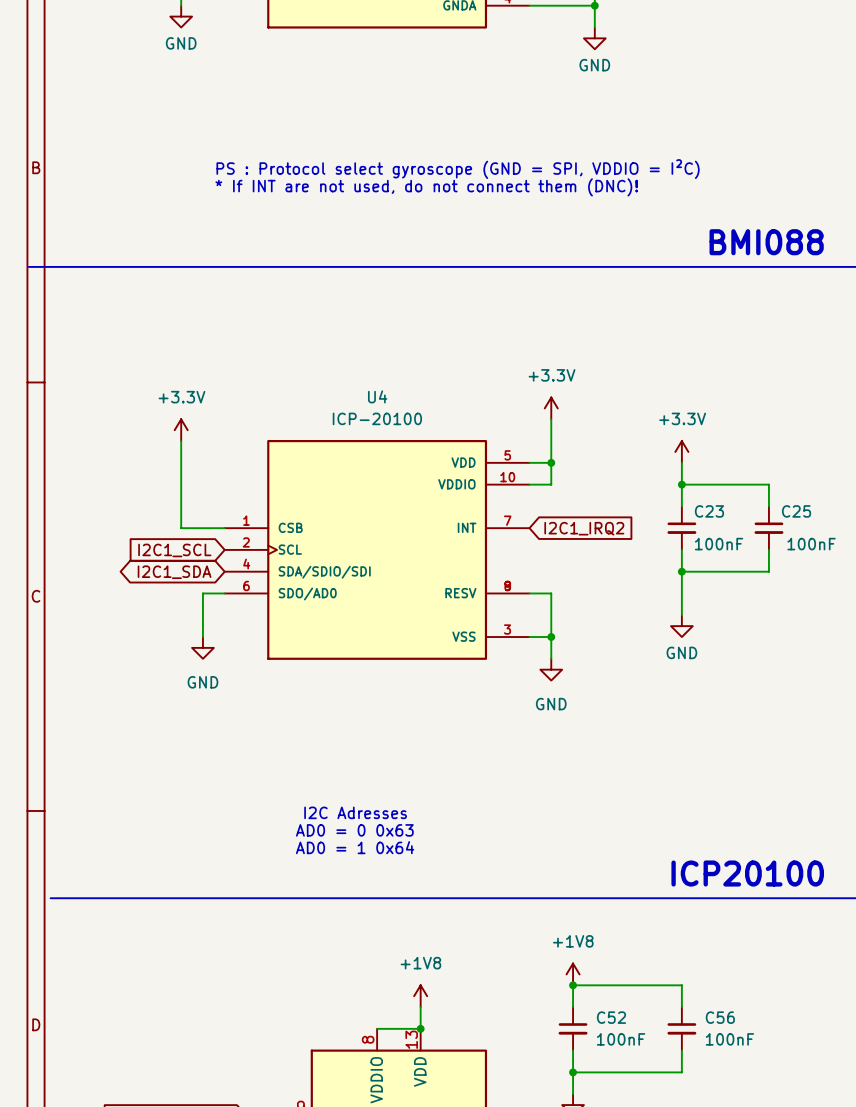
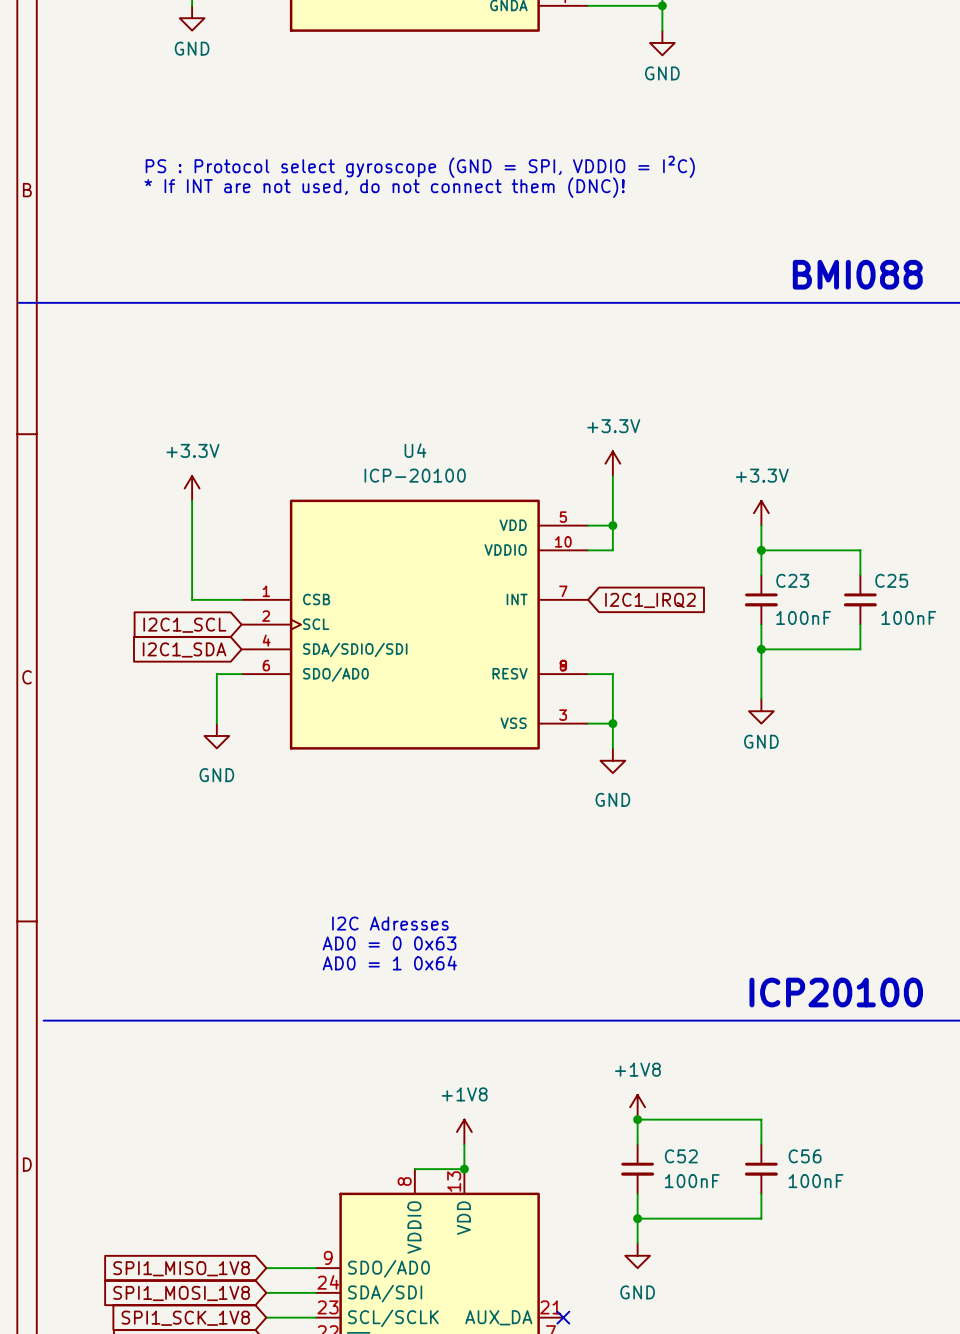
text position: PS : Protocol select gyroscope (GND = SPI, VDDIO = I²C) (458, 169) -> PS : Protocol select gyroscope (GND = SPI, VDDIO = I²C) (420, 166)
text position: * If INT are not used, do not connect them (DNC)! (426, 187) -> * If INT are not used, do not connect them (DNC)! (384, 187)
global label shape: bidirectional (174, 572) -> input (184, 649)

